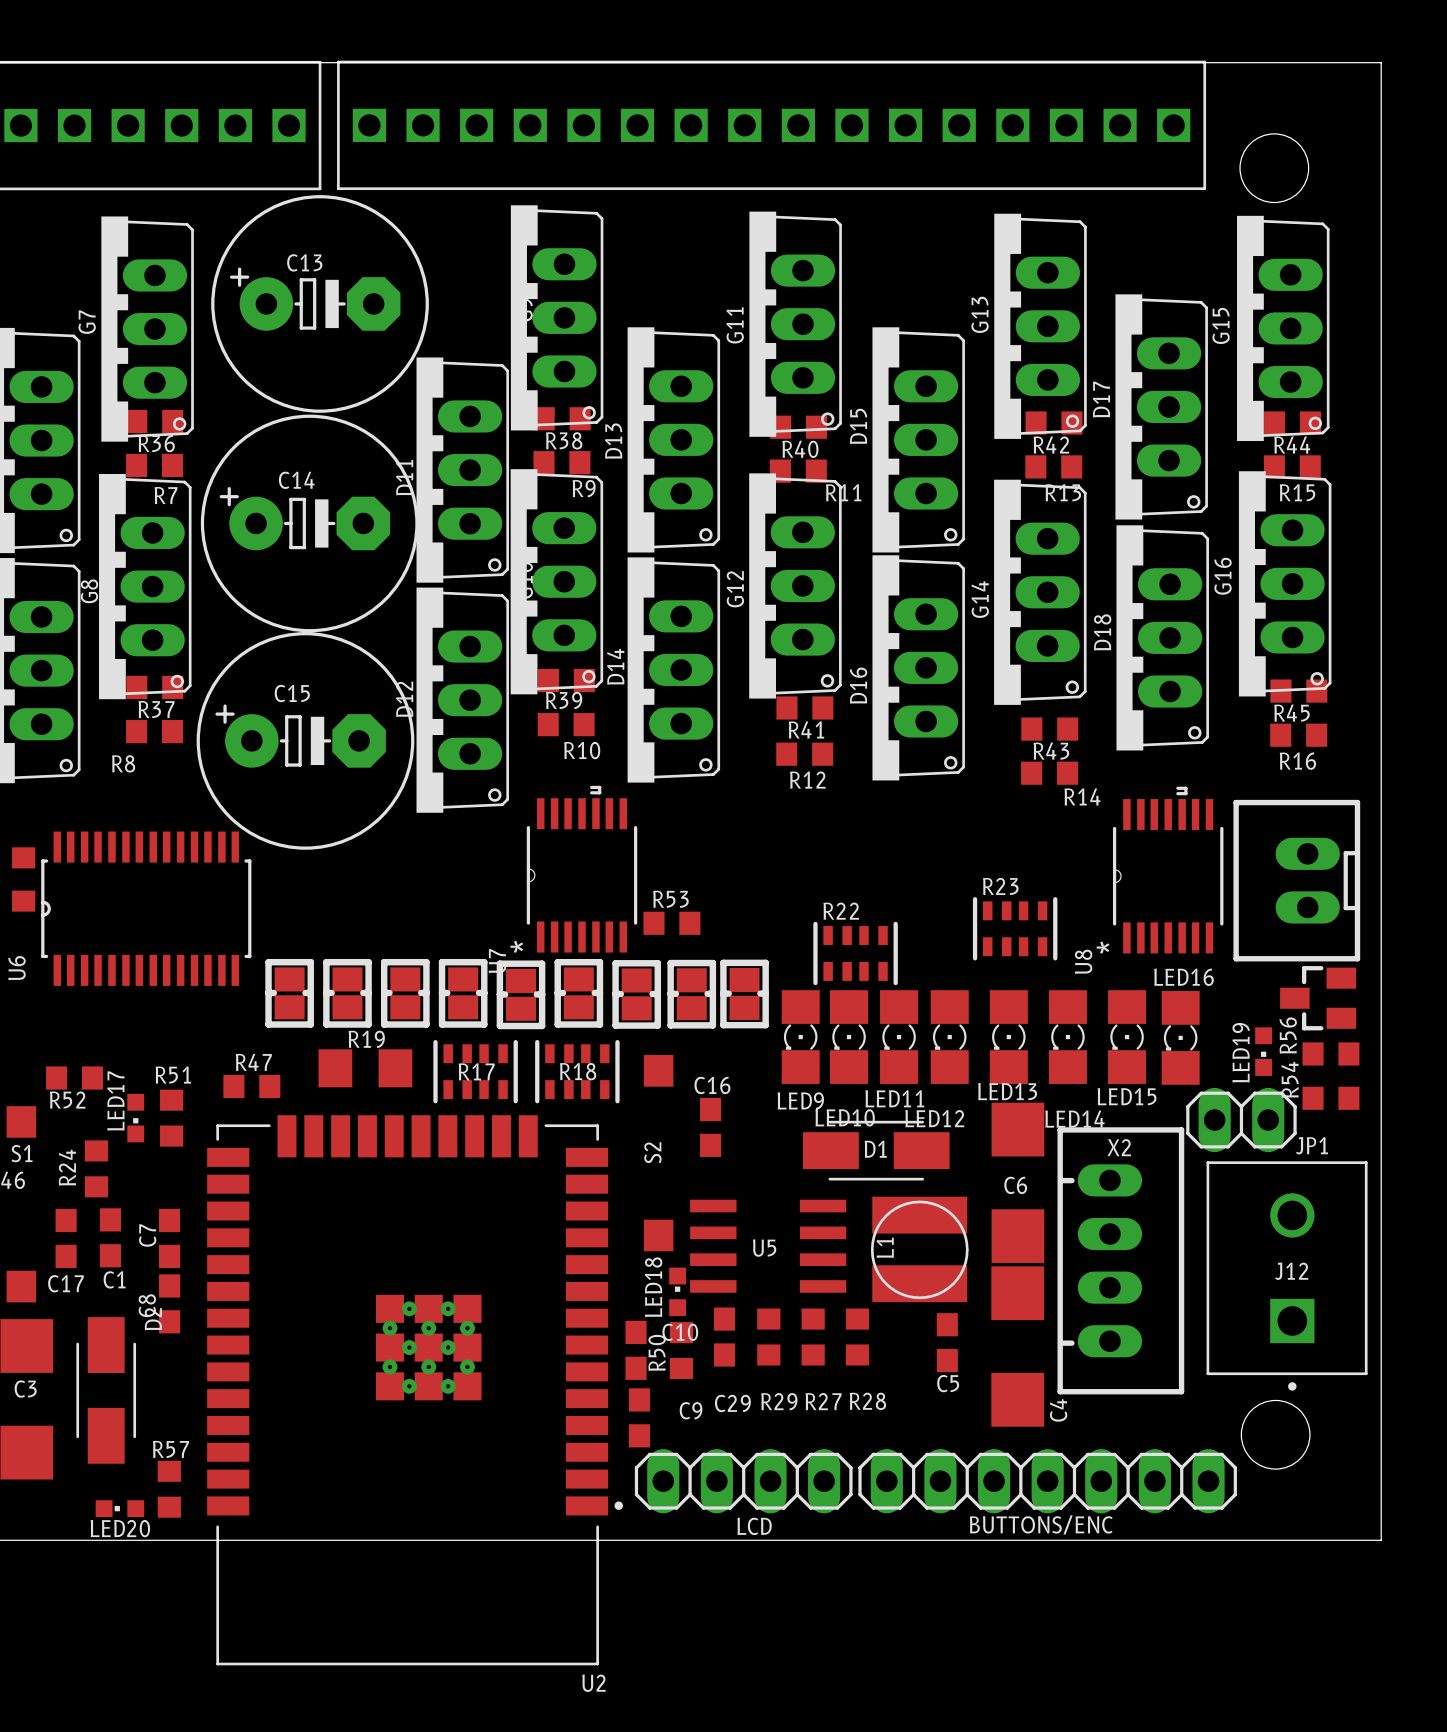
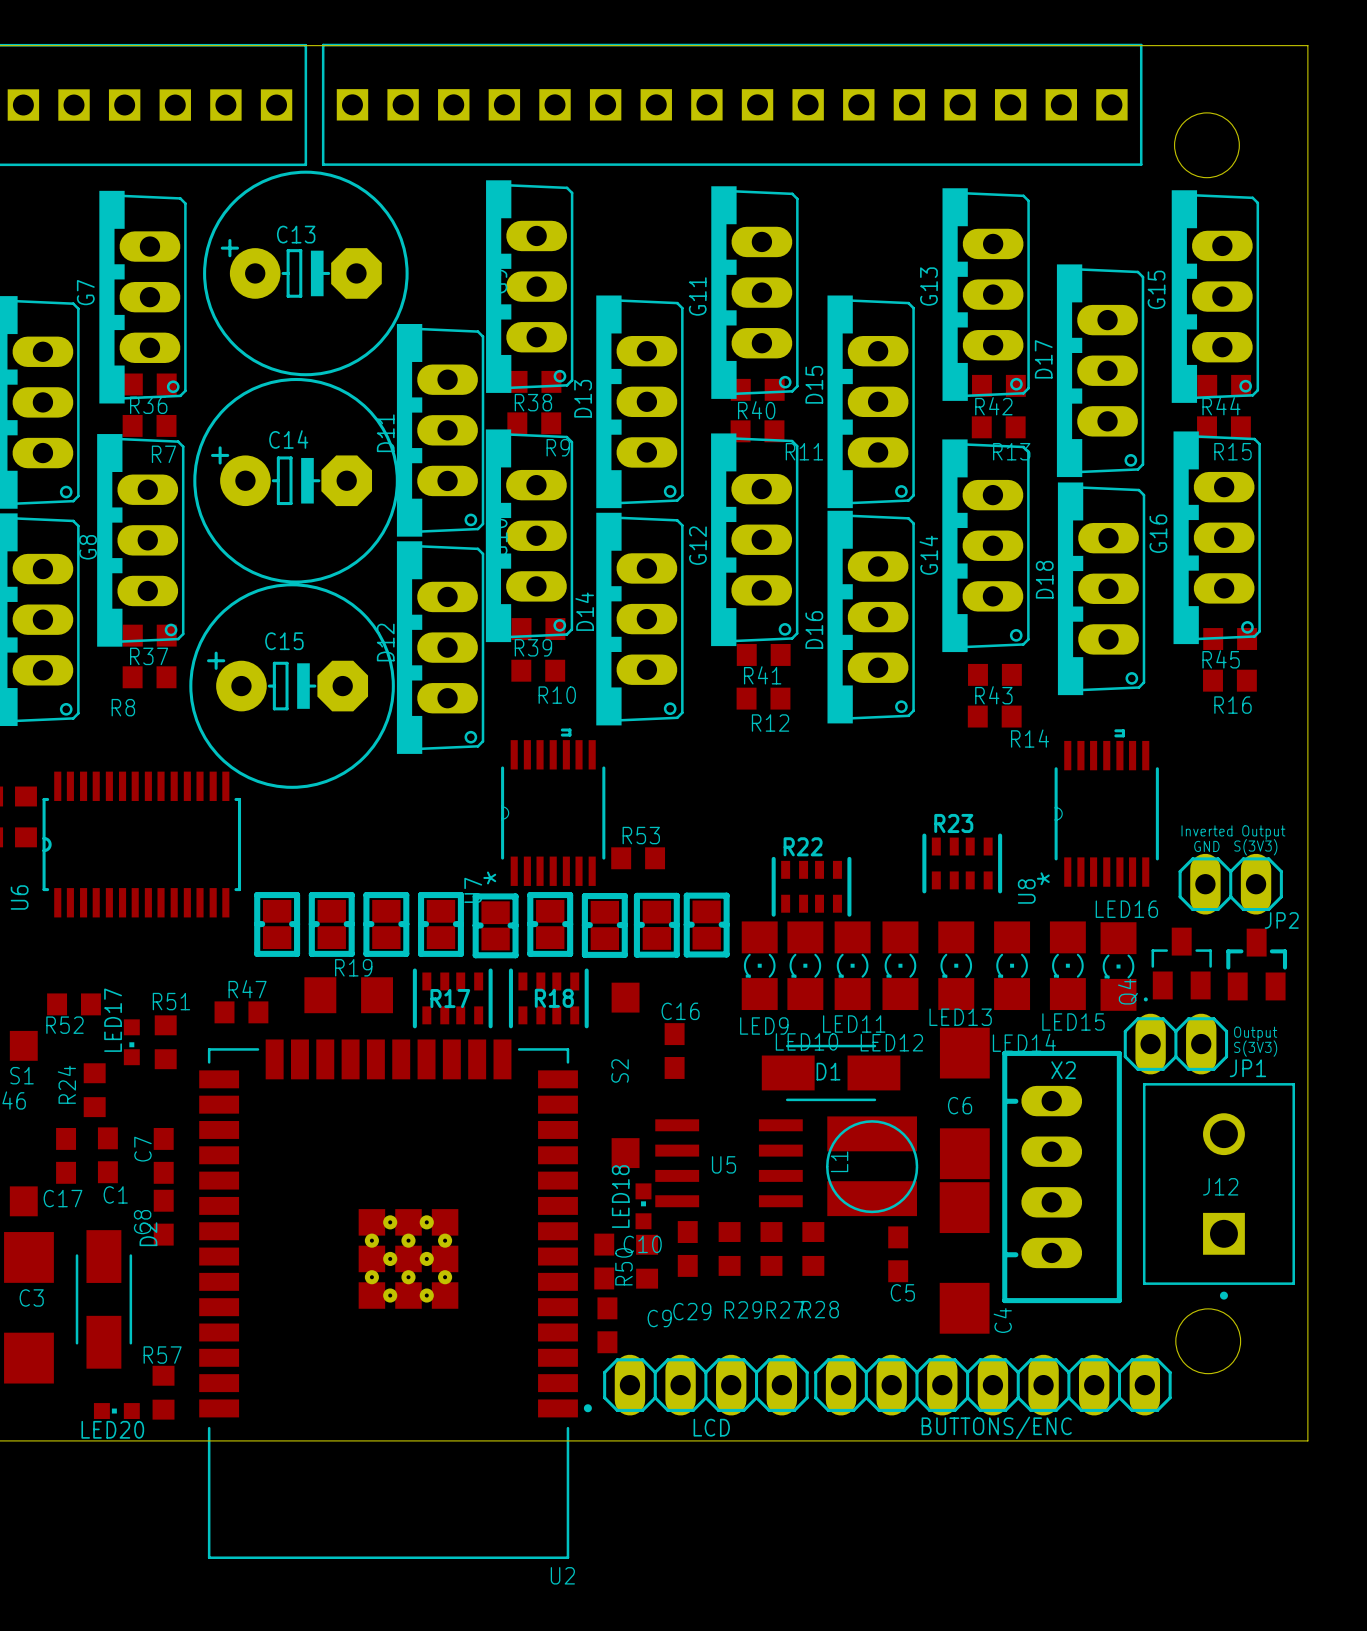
part: (1296, 880) -> none
text: none -> Inverted Output (1233, 832)
text: none -> GND (1206, 846)
text: none -> S(3V3) (1255, 847)
JP2: none -> (1230, 884)
part rotation: 0° (1318, 998) -> 90° clockwise (1256, 964)
Q4: none -> (1177, 964)
LED19: (1263, 1051) -> none
R56: (1330, 1053) -> none
R54: (1330, 1098) -> none
text: none -> Output (1255, 1033)
text: none -> S(3V3) (1255, 1048)

